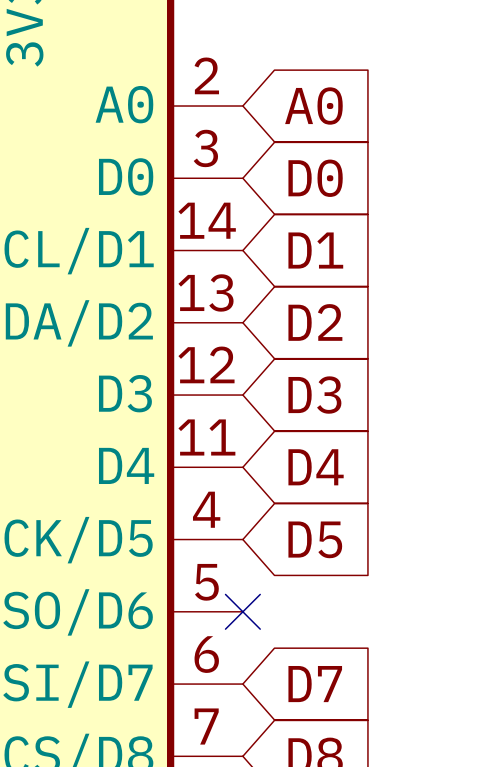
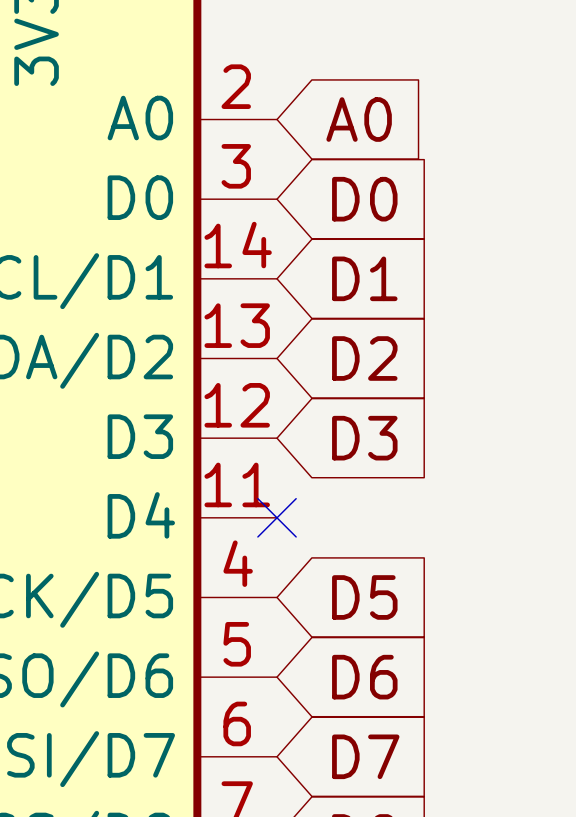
global label: D4 (316, 467) -> none
no-connect mark position: (242, 611) -> (277, 517)
global label: none -> D6 (364, 677)

